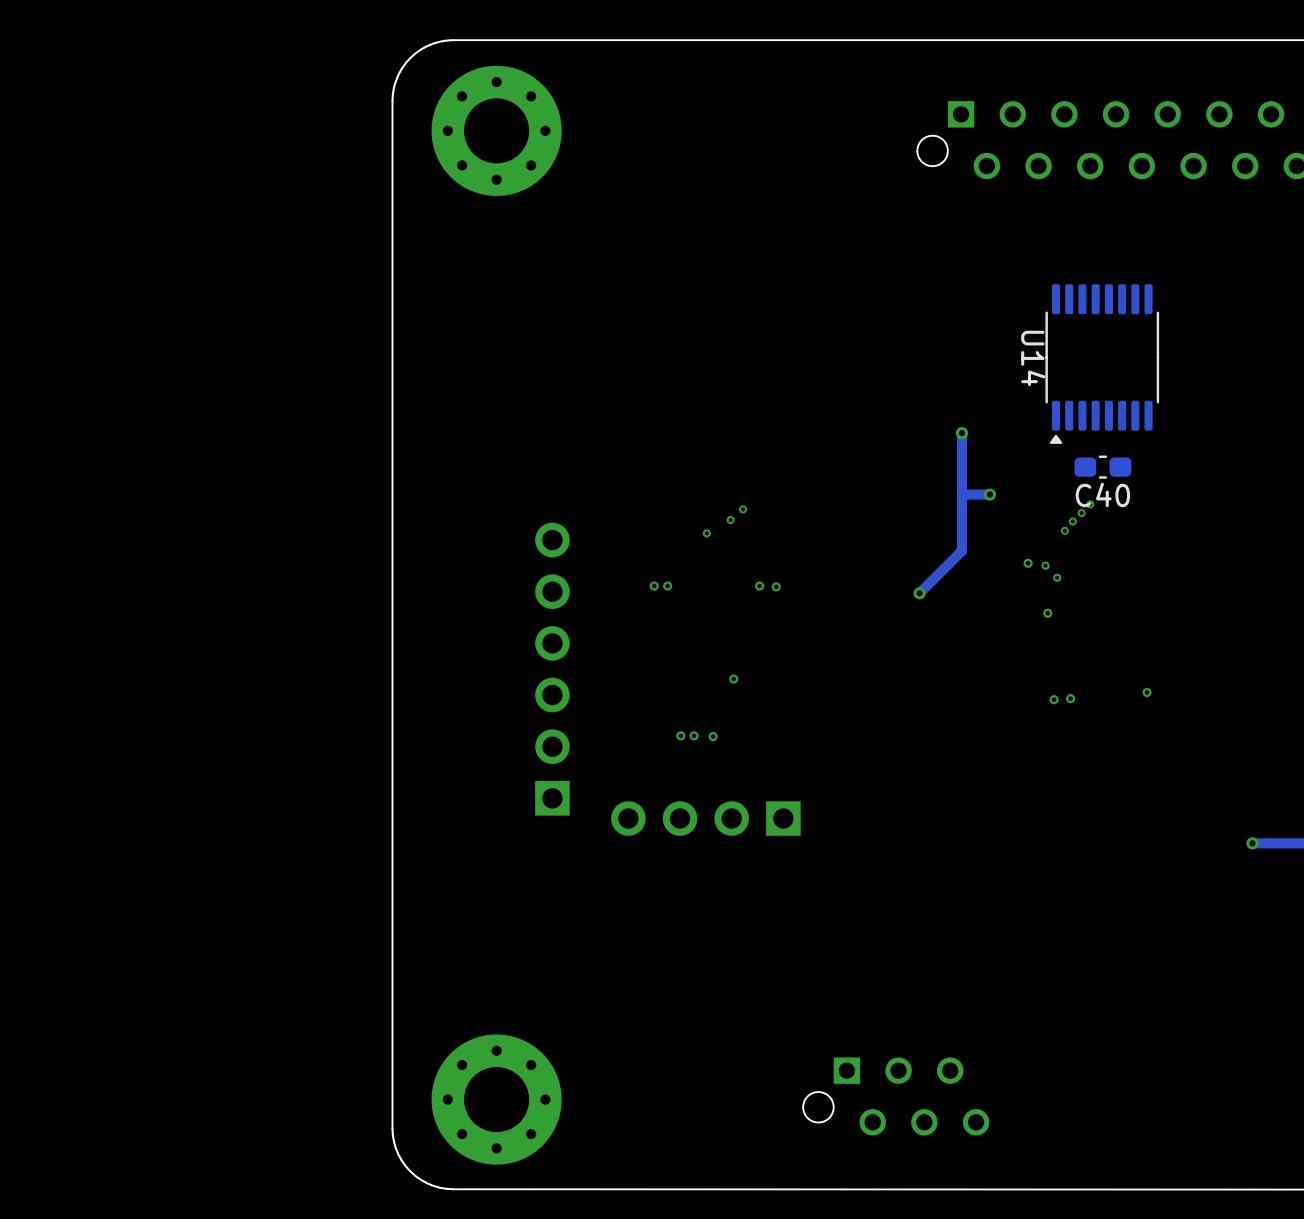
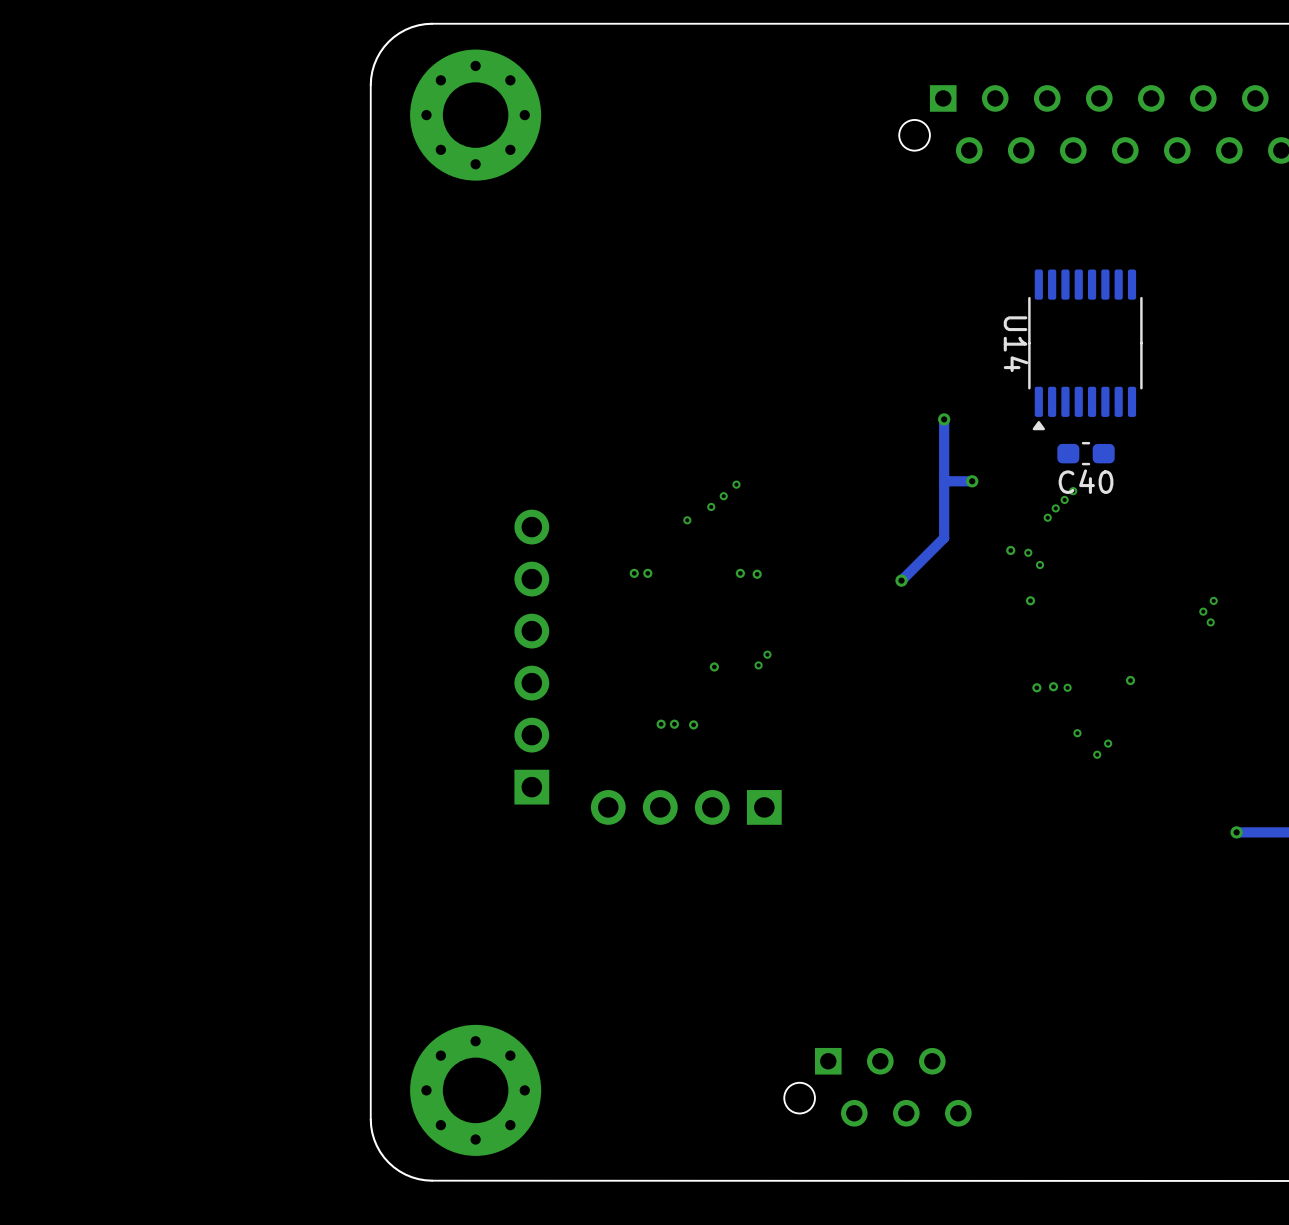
via: none -> (736, 484)
via: none -> (1213, 600)
via: none -> (1203, 611)
via: none -> (1210, 622)
via: none -> (767, 654)
via: none -> (758, 665)
via: none -> (1067, 687)
via: none -> (1077, 733)
via: none -> (1108, 743)
via: none -> (1097, 754)

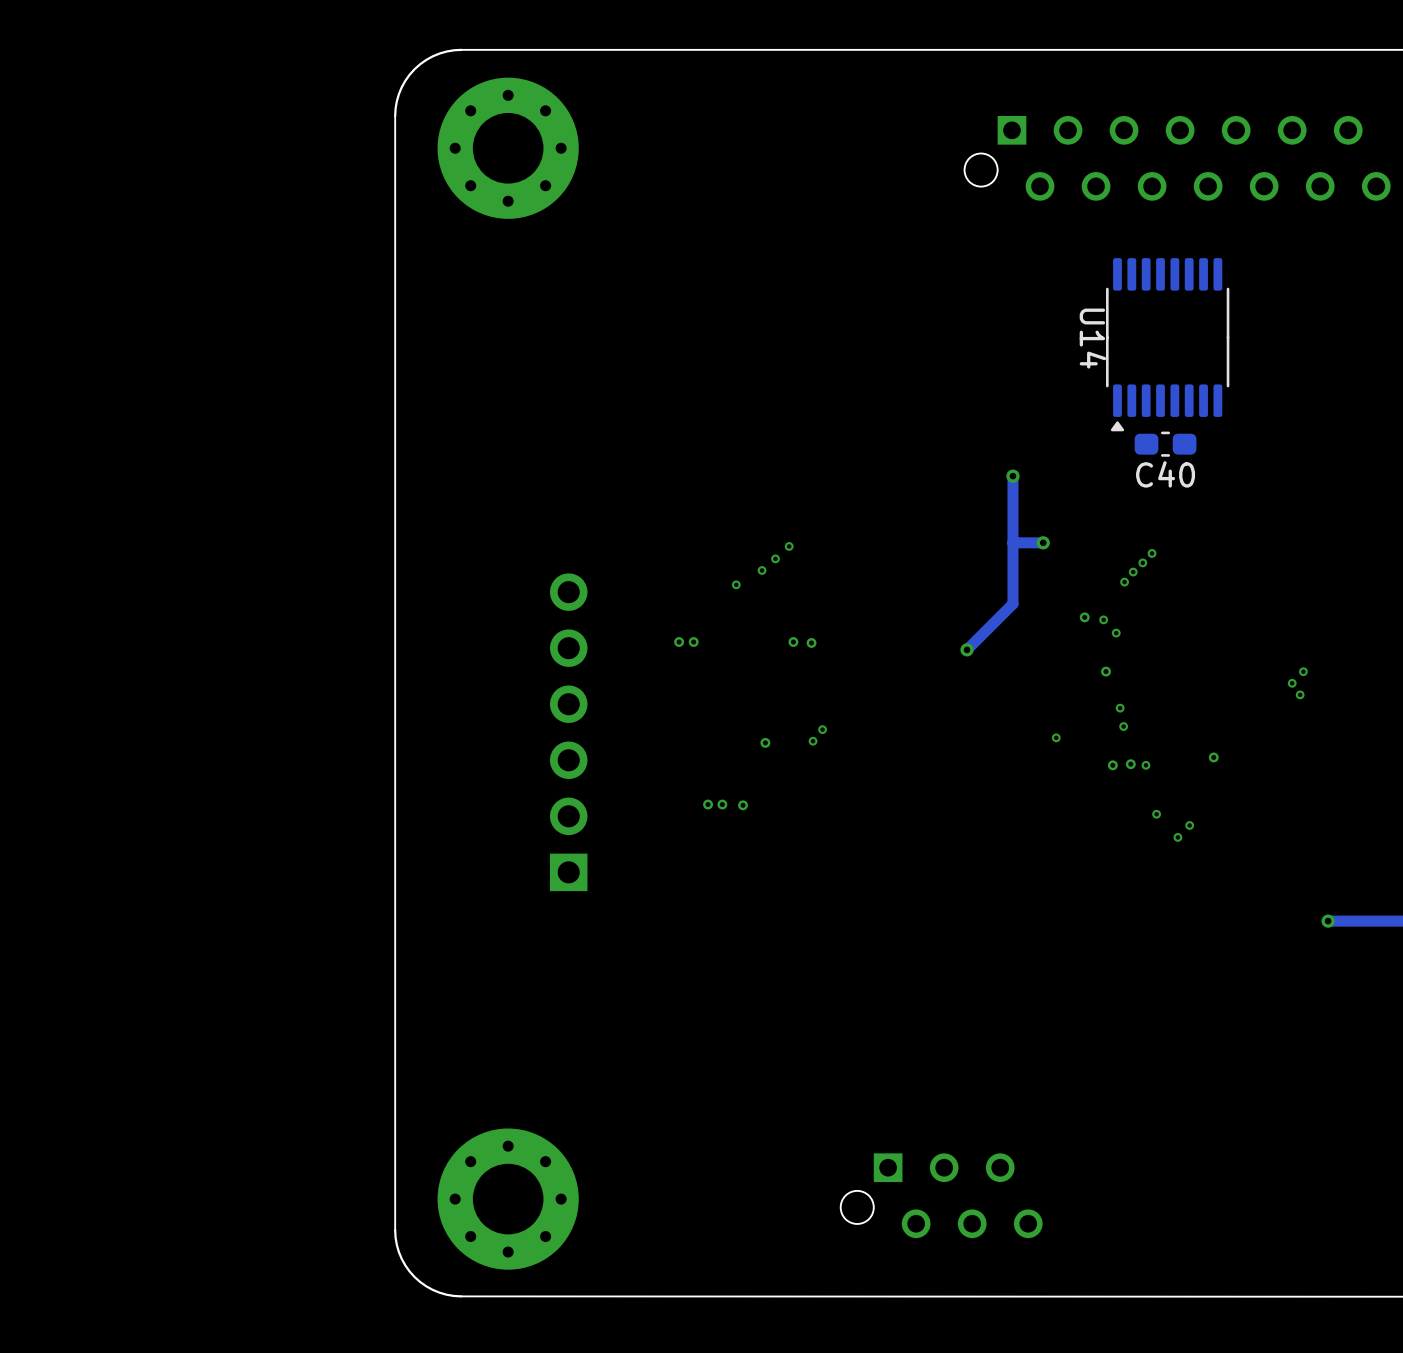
U14 position: (1085, 349) -> (1167, 344)
C40 position: (1086, 453) -> (1165, 444)
via: none -> (1120, 708)
via: none -> (1123, 726)
via: none -> (1056, 737)
part: (686, 807) -> none

